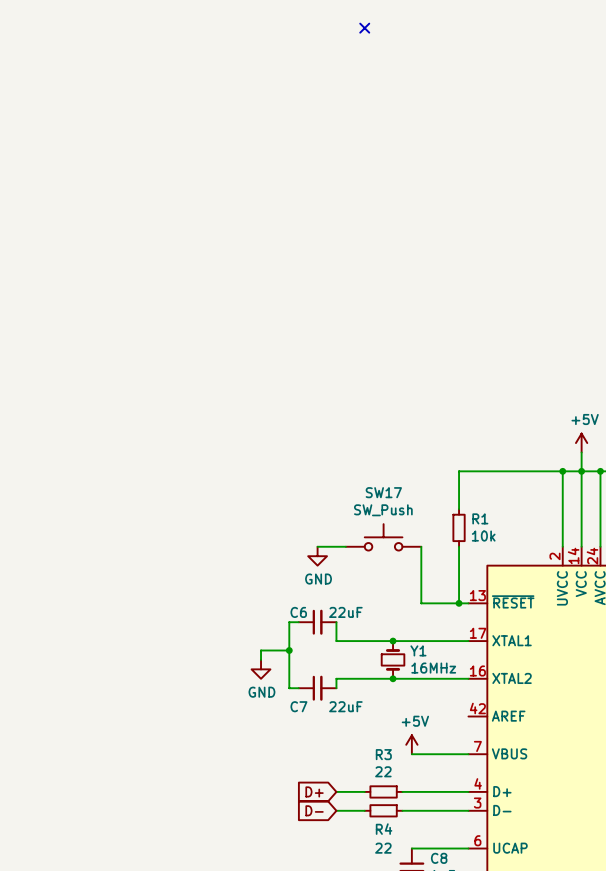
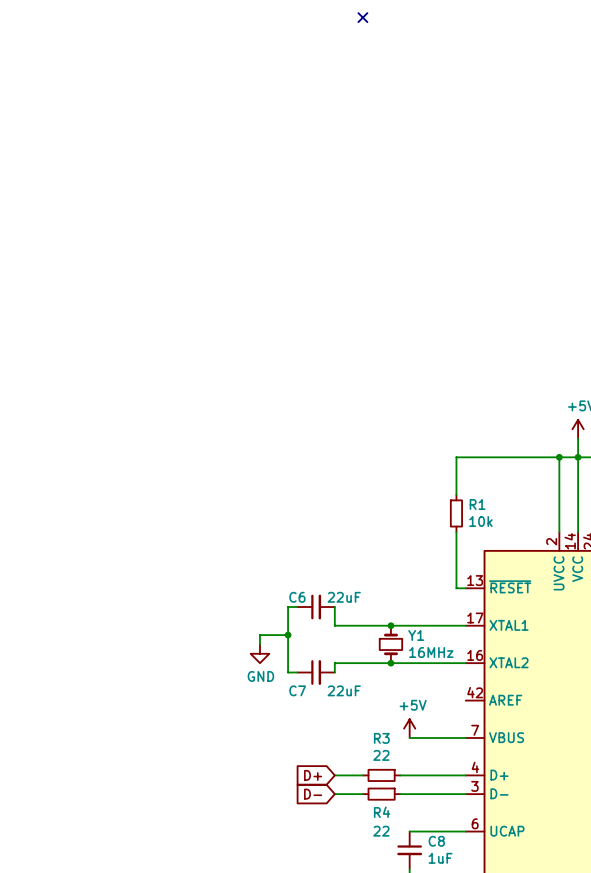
SW17: SW_Push (383, 537) -> none
wire: (317, 546) (345, 546) -> none
wire: (421, 546) (421, 603) (459, 603) -> none
power symbol: GND (317, 556) -> none
junction: (459, 603) -> none

